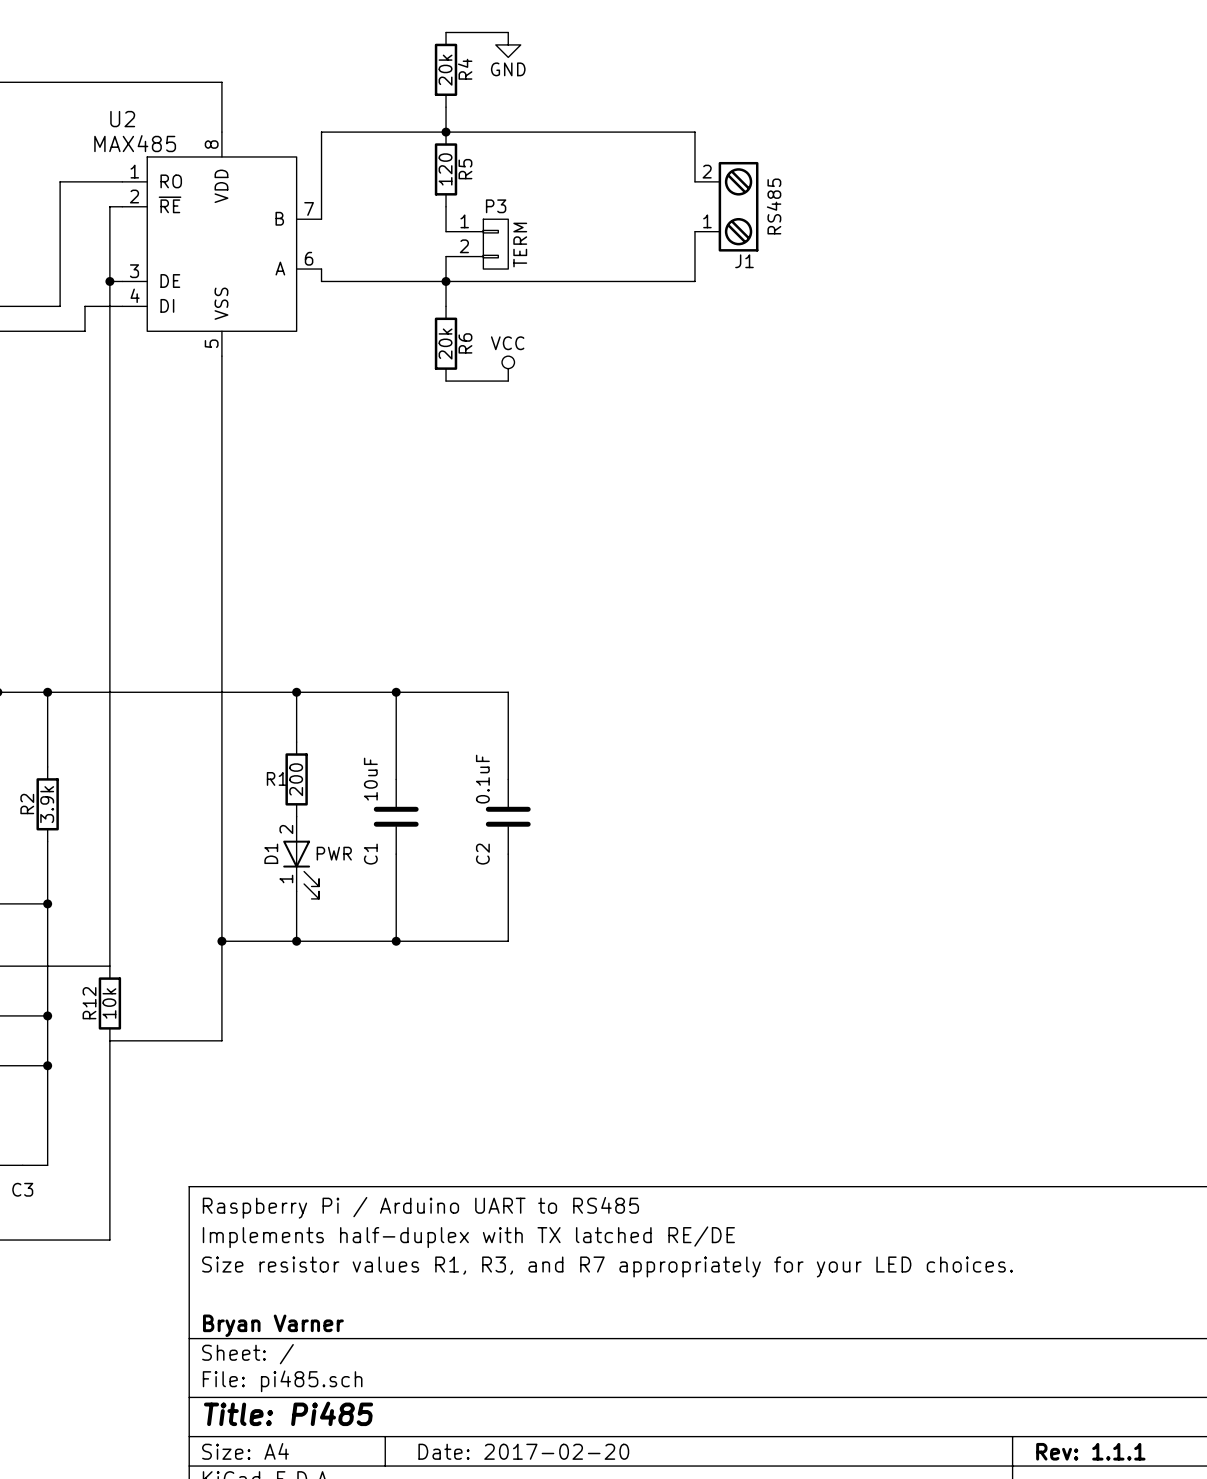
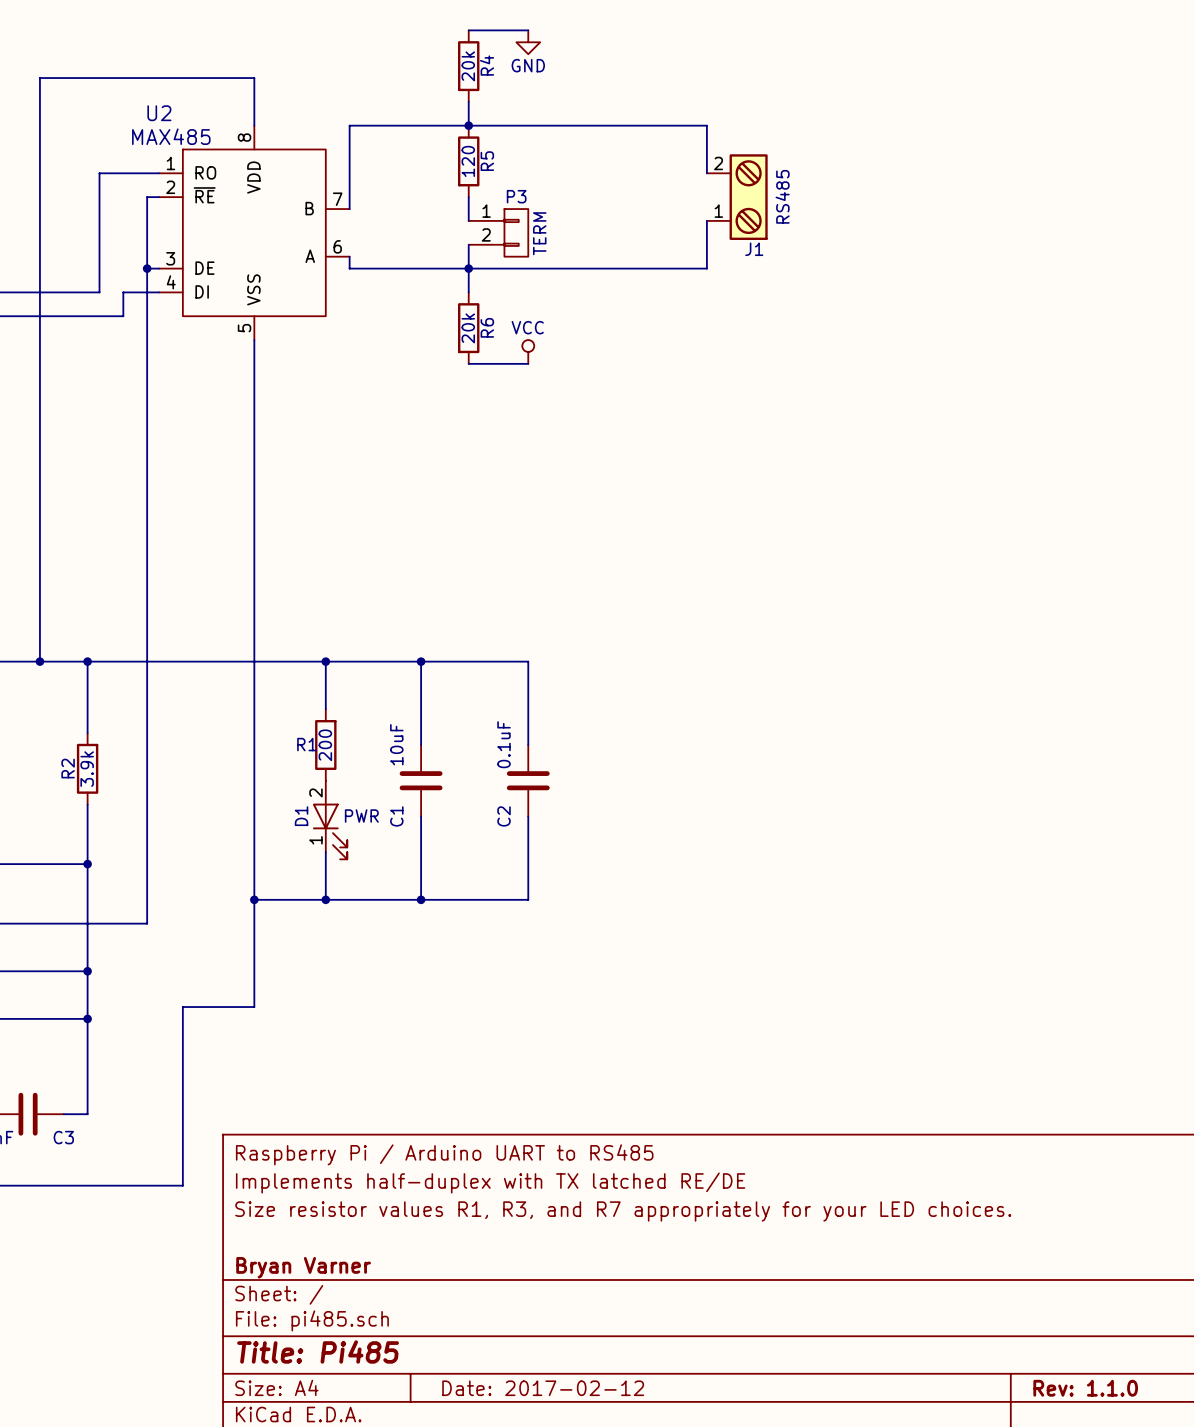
R12: 10k (109, 1003) -> none
wire: (221, 1040) (109, 1040) (109, 1240) -> (254, 995) (254, 1007) (182, 1007) (182, 1185) (147, 1185)
title block: Date: 2017-02-20 (523, 1451) -> Date: 2017-02-12 (543, 1388)
title block: Rev: 1.1.1 (1090, 1451) -> Rev: 1.1.0 (1085, 1388)

